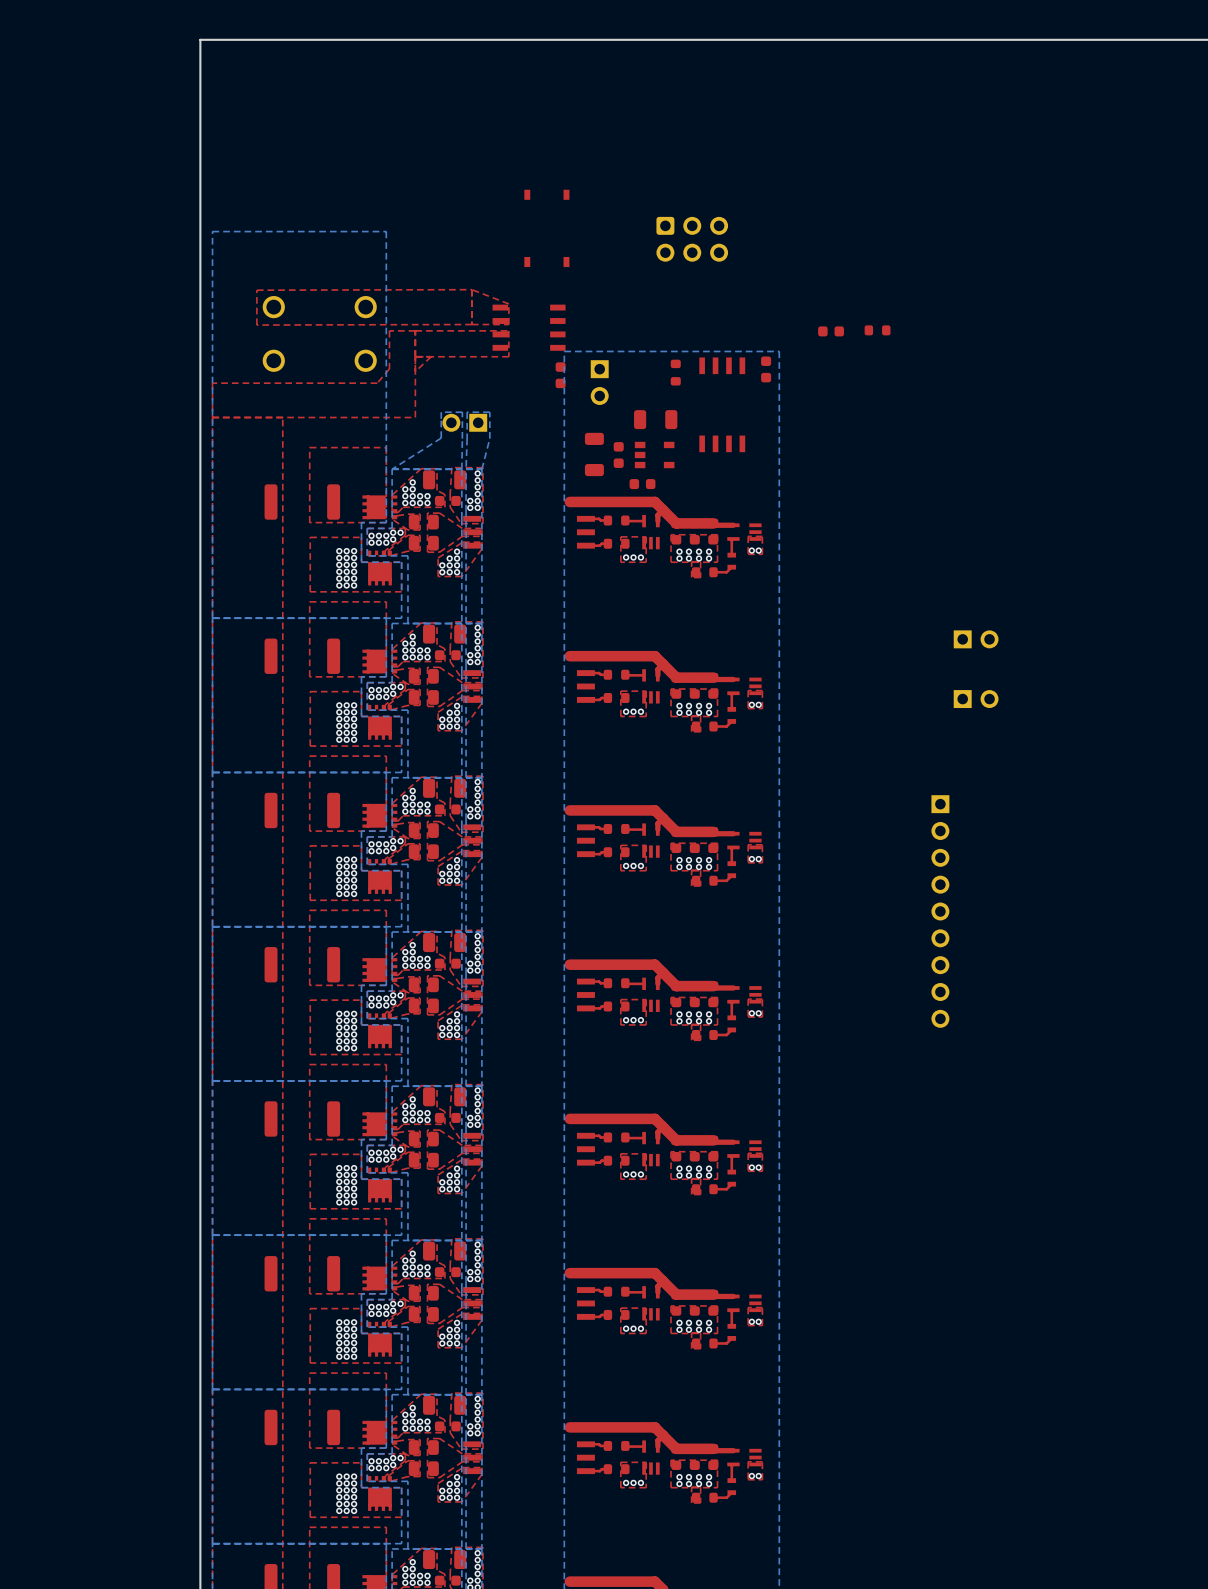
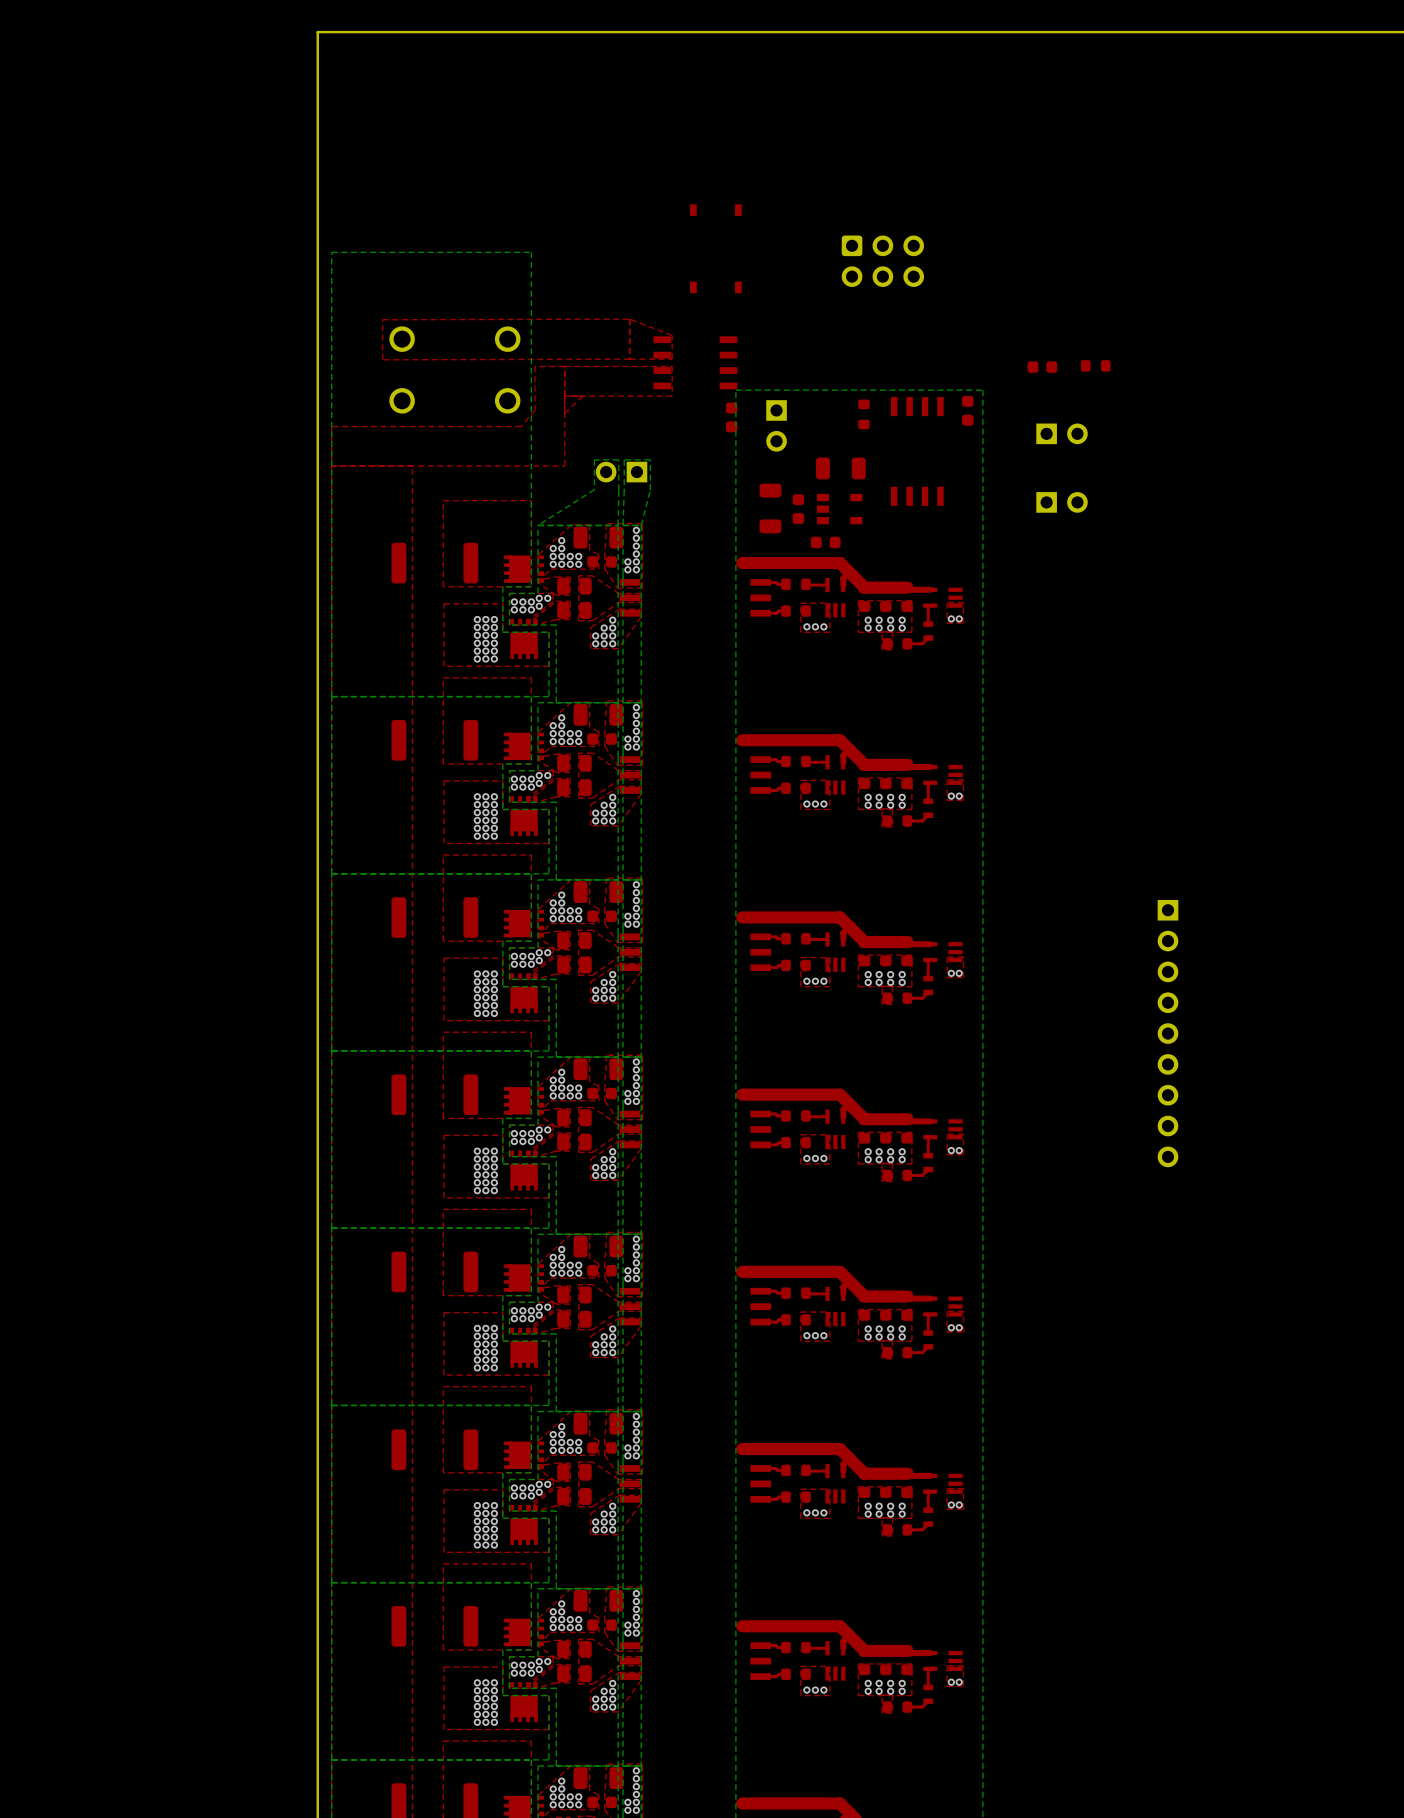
part: none -> (1062, 433)
part: none -> (1062, 502)
part: (976, 639) -> none
part: (976, 699) -> none

